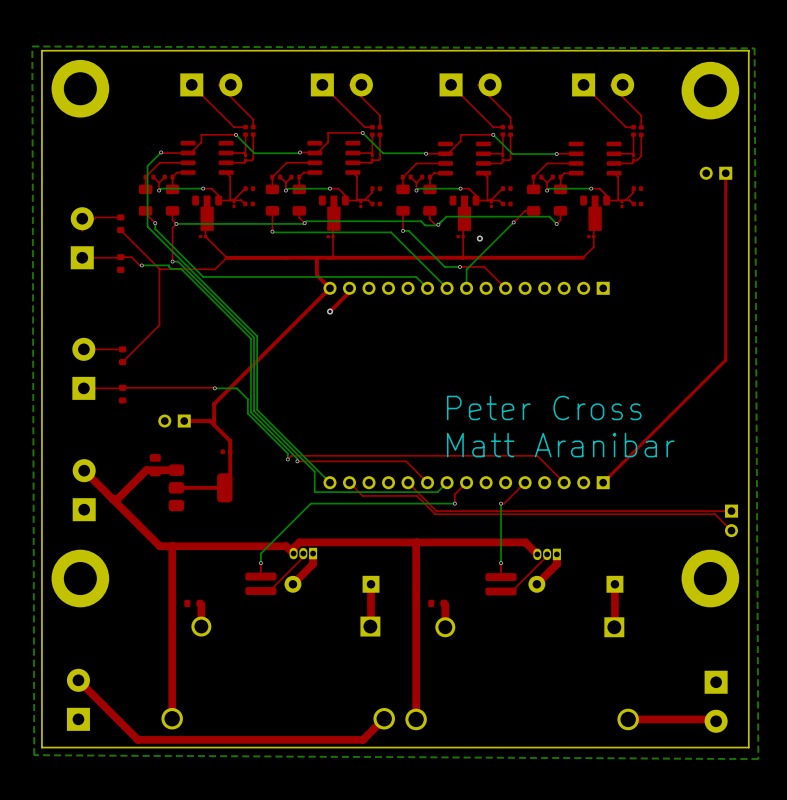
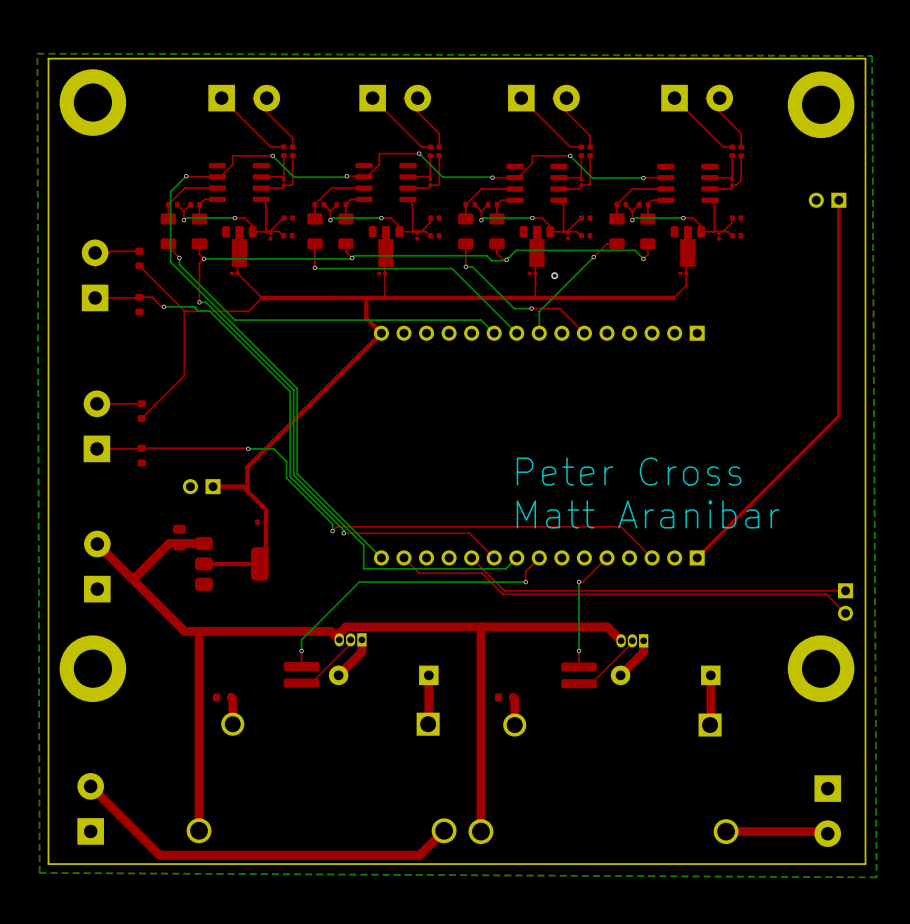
top track: (349, 292) (330, 311) -> none
via: (330, 311) -> none

